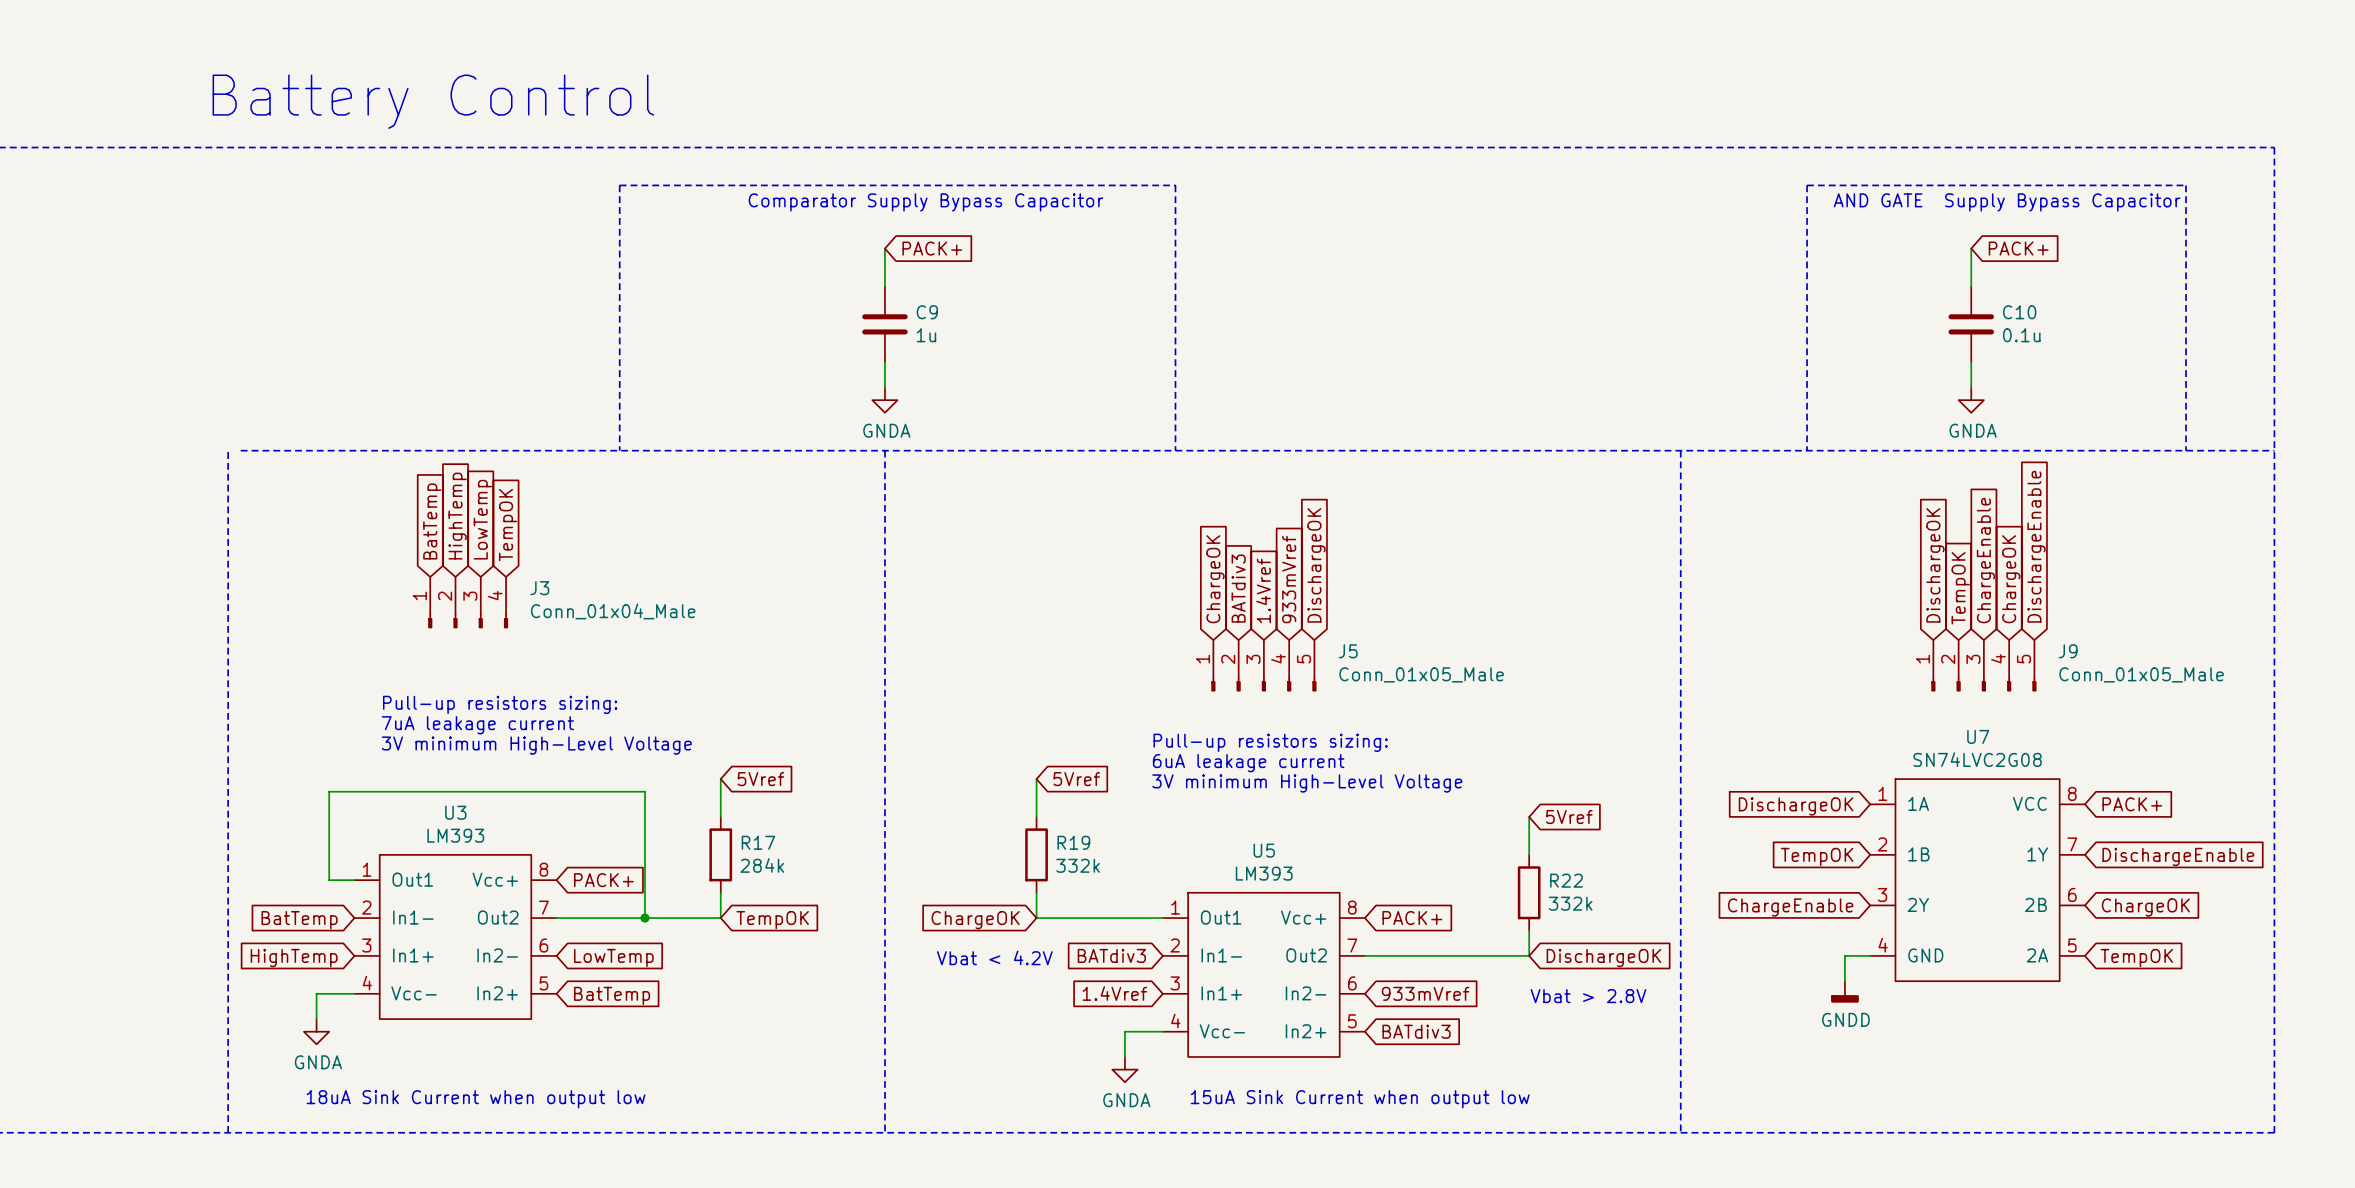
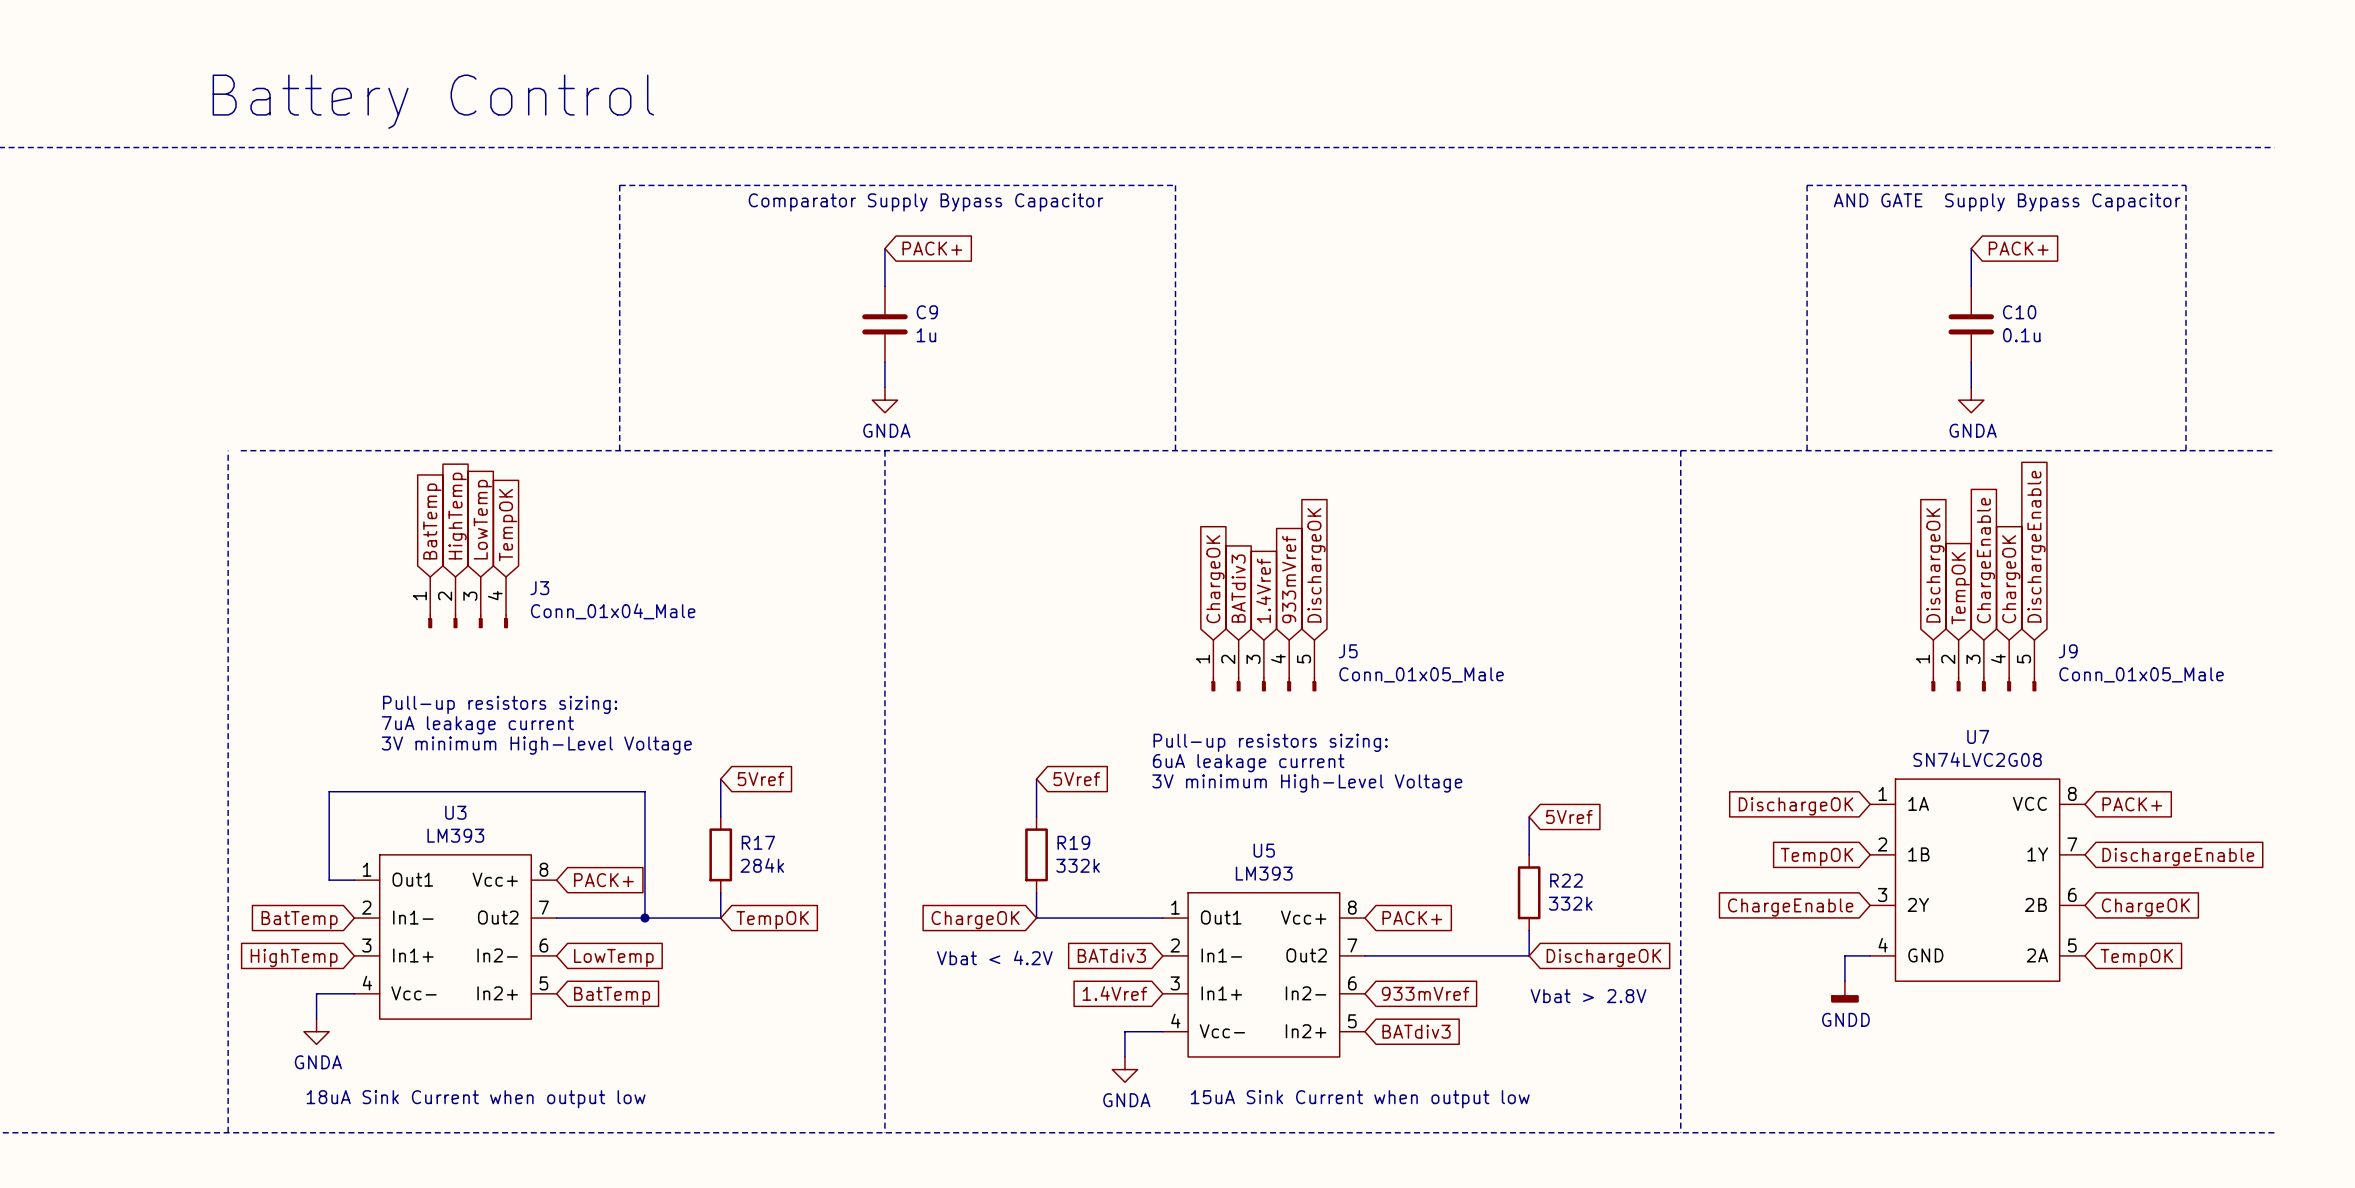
line: (2274, 147) (2274, 1132) -> none

